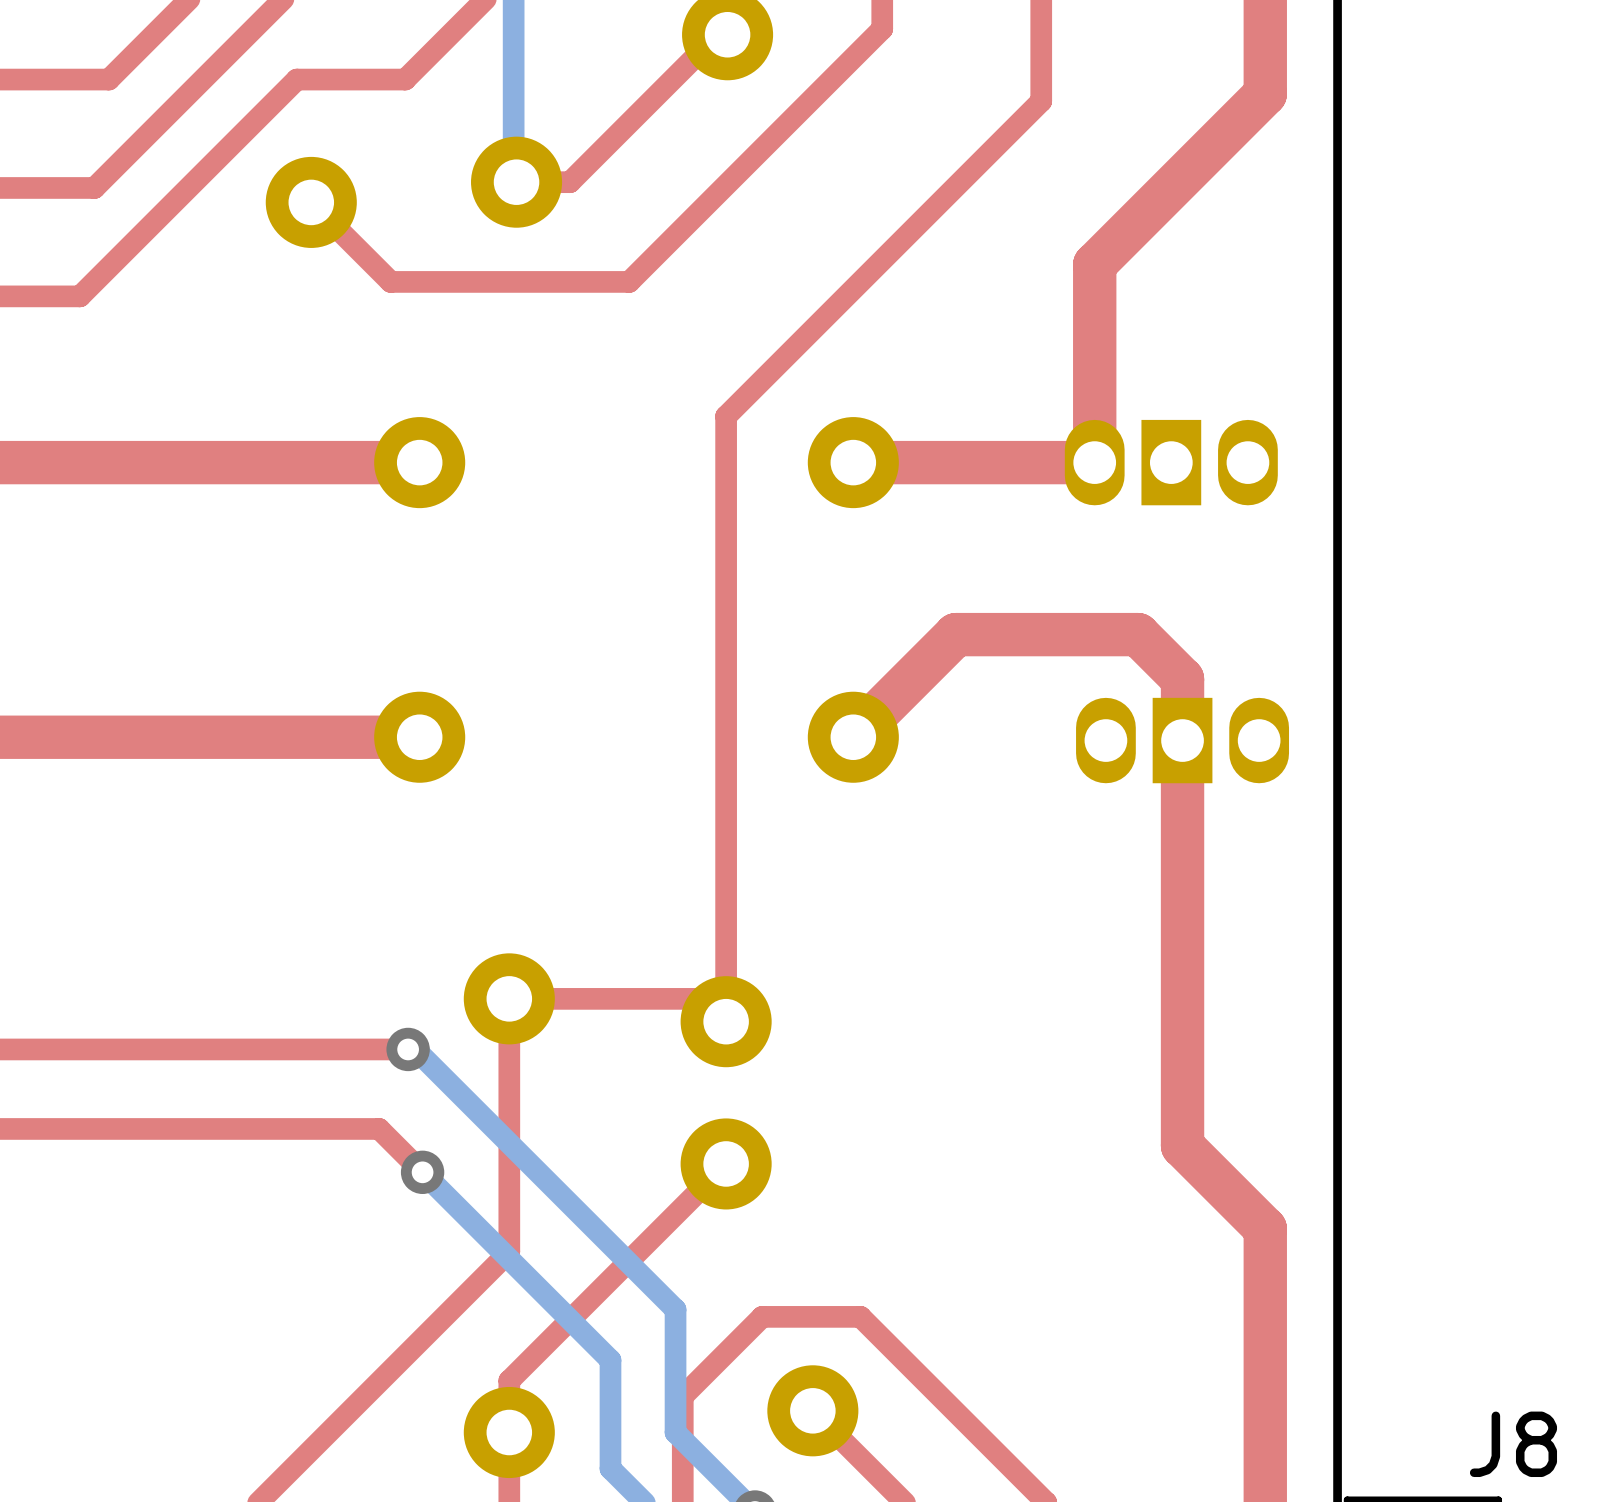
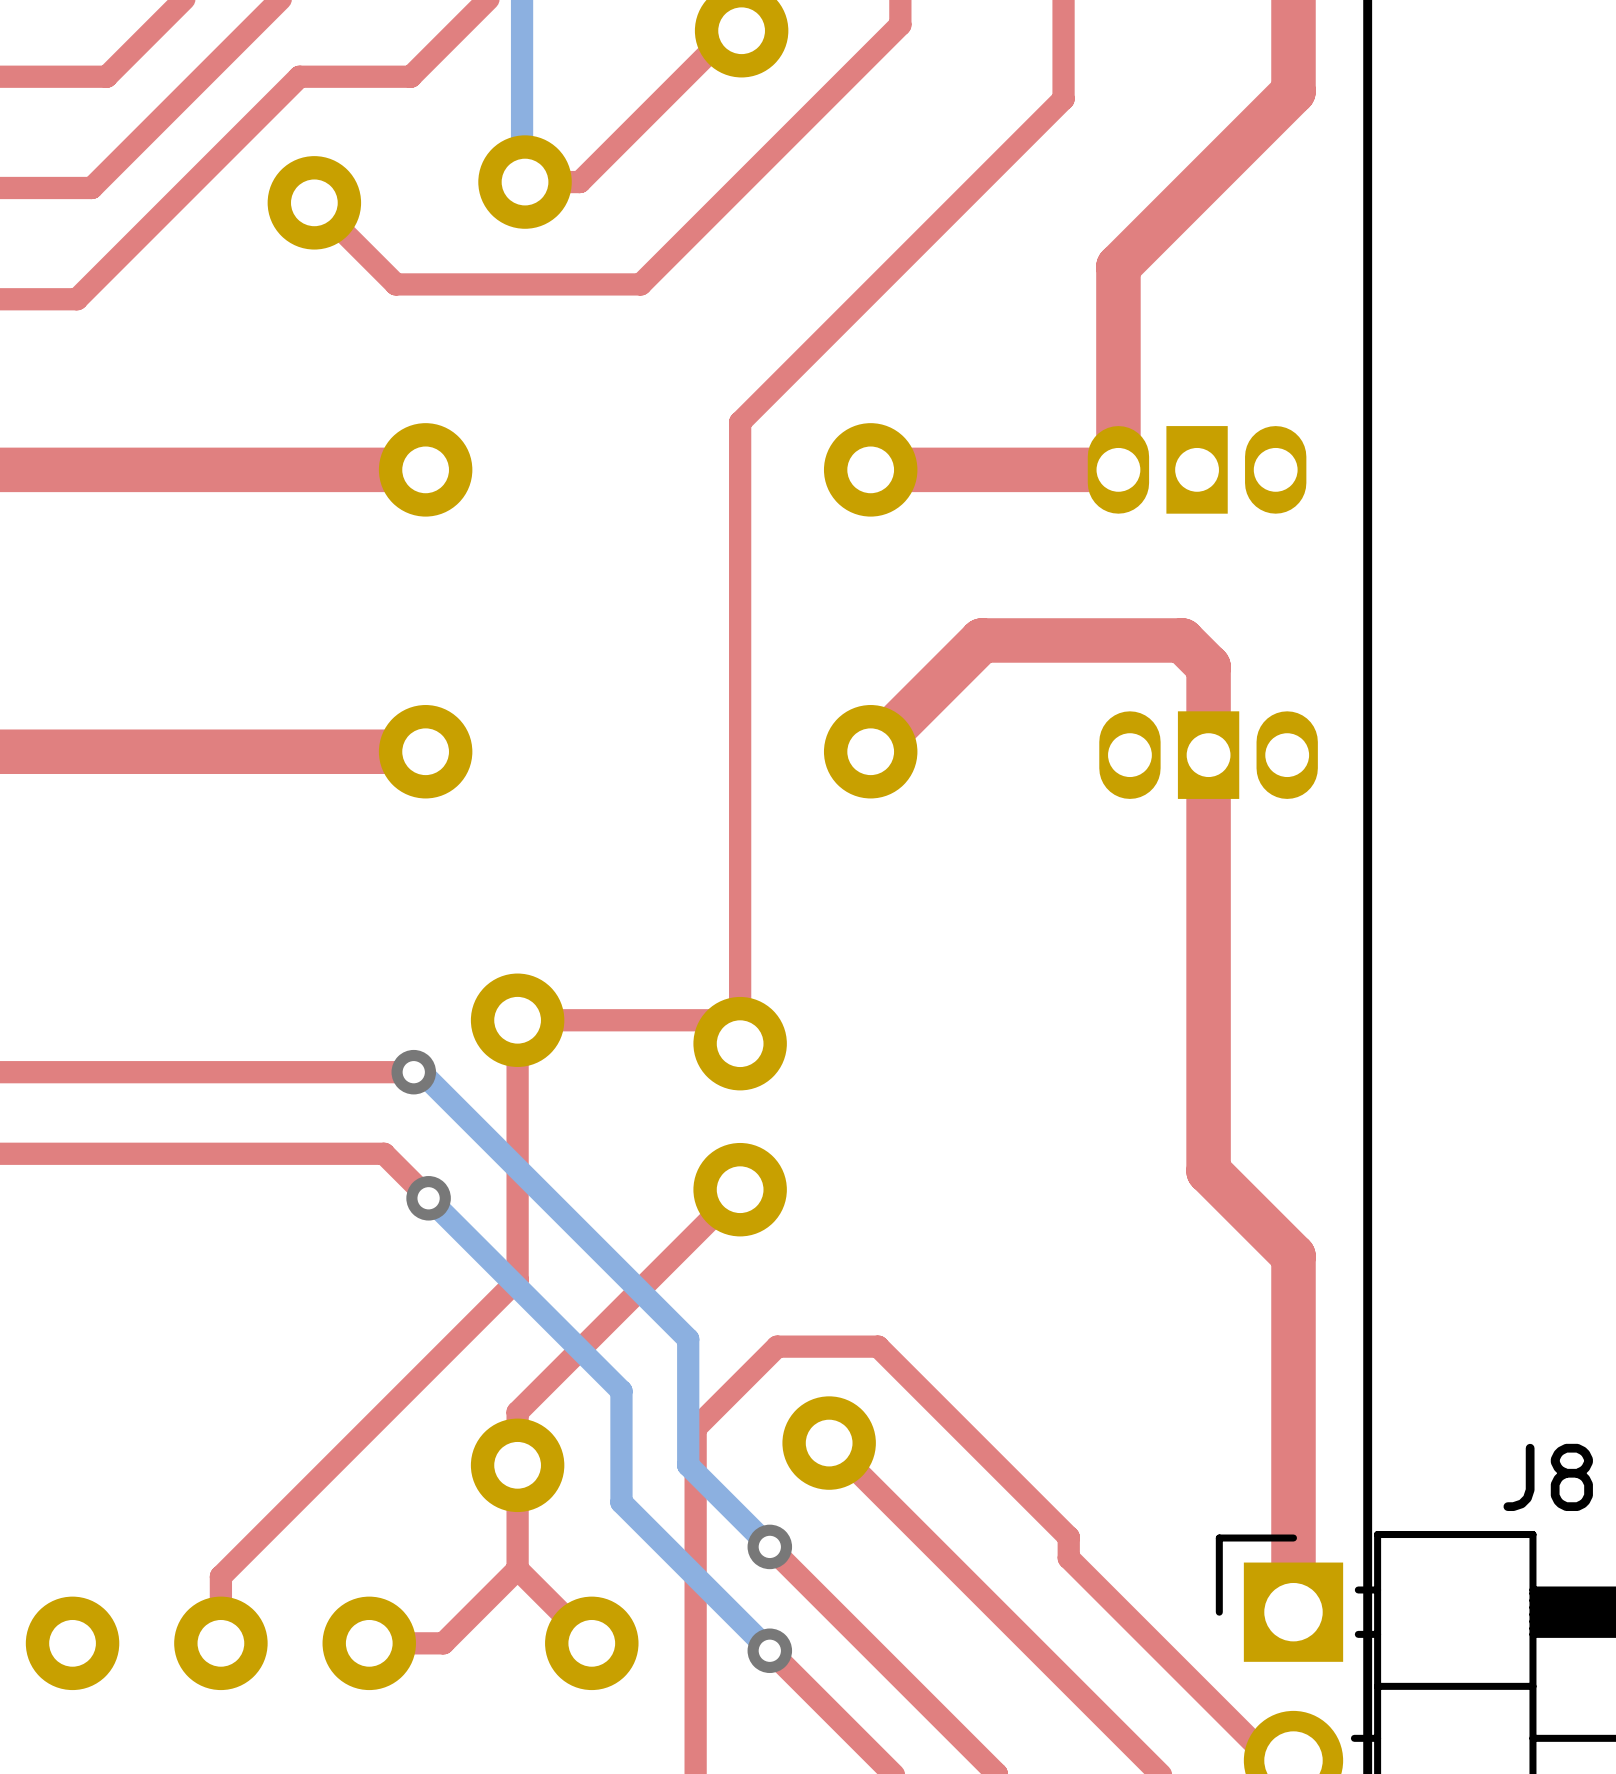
top track: (955, 634) (1138, 634) (1182, 679) -> (976, 646) (981, 640) (1182, 640) (1208, 666) (1208, 692)

